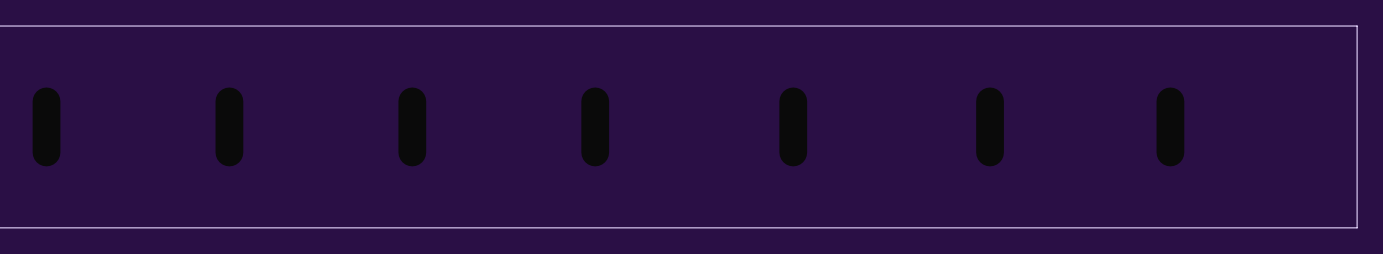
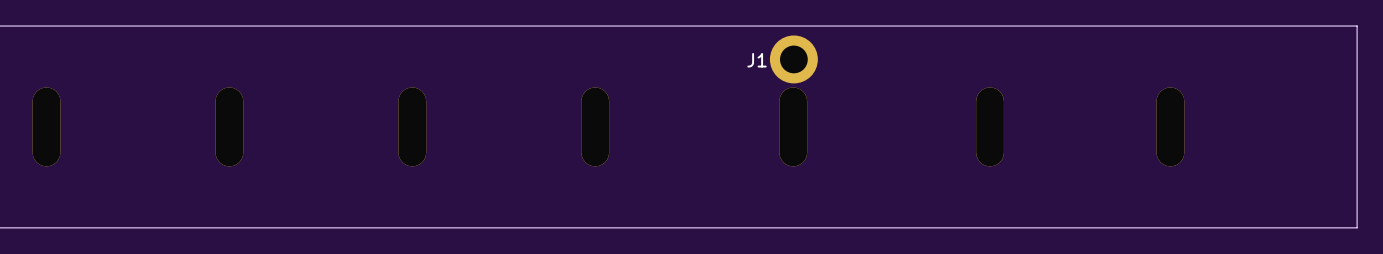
J1: none -> (793, 59)
part footprint: [32, 87, 61, 167] -> [32, 87, 61, 167]
part footprint: [215, 87, 244, 167] -> [215, 87, 244, 167]
part footprint: [398, 87, 427, 167] -> [398, 87, 427, 167]
part footprint: [581, 87, 610, 167] -> [581, 87, 610, 167]
part footprint: [779, 87, 808, 167] -> [779, 87, 808, 167]
part footprint: [976, 87, 1004, 167] -> [976, 87, 1004, 167]
part footprint: [1156, 87, 1185, 167] -> [1156, 87, 1185, 167]

